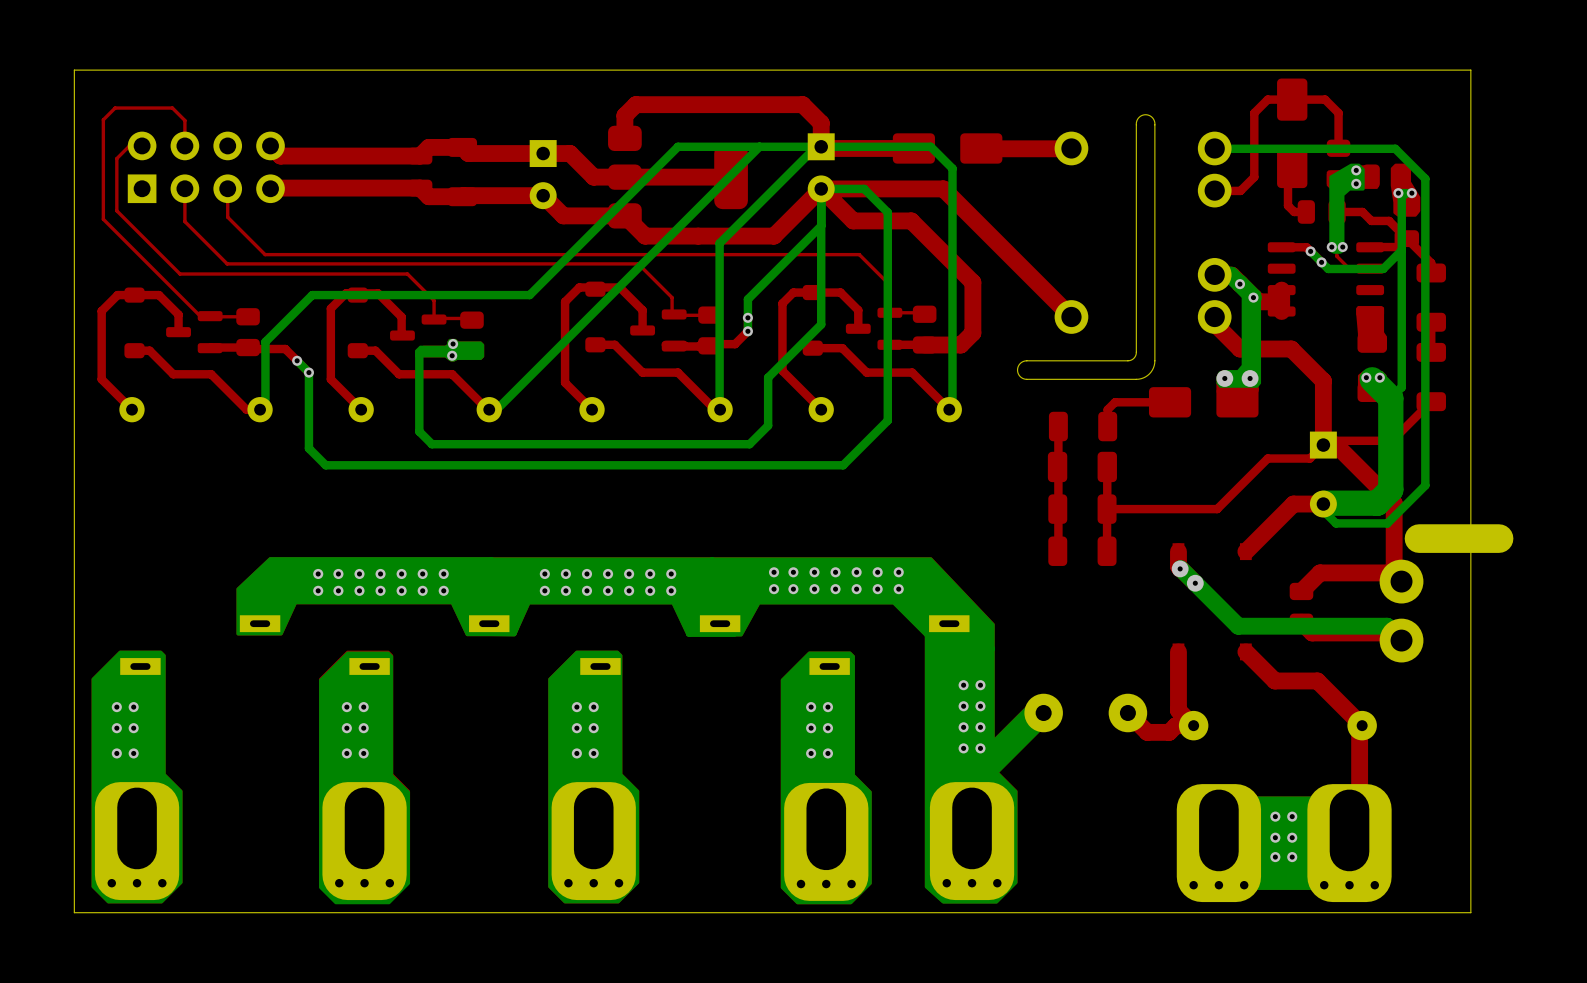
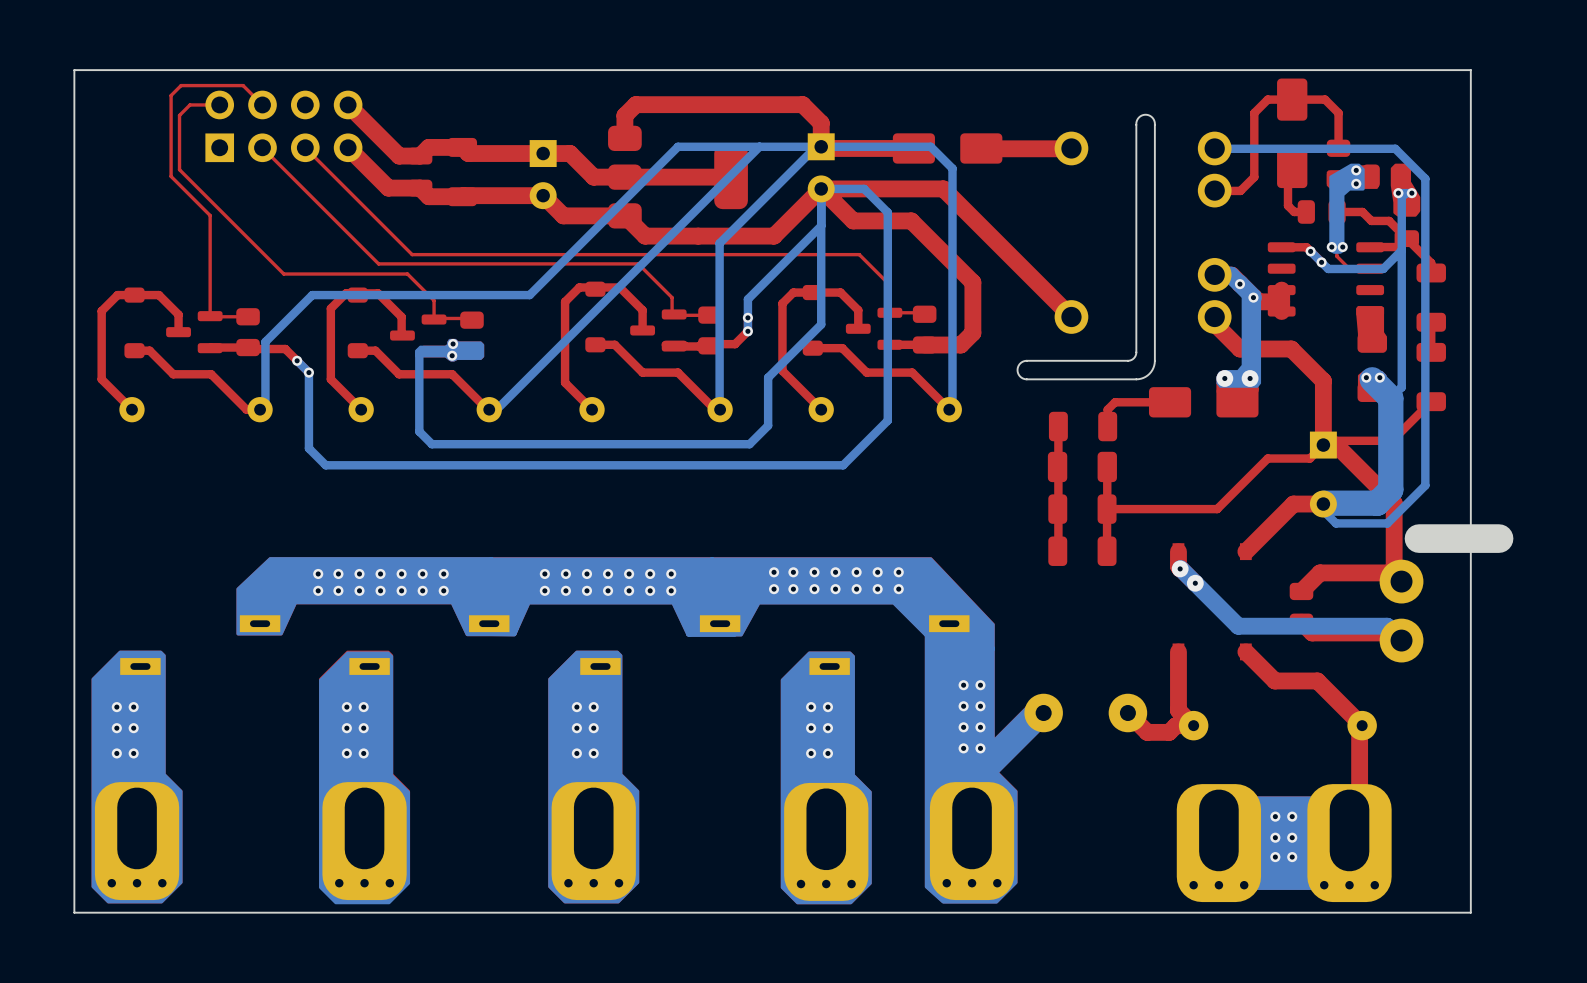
top track: (142, 145) (129, 145) (116, 158) (116, 210) (180, 274) (283, 274) -> (219, 104) (189, 104) (179, 115) (179, 169) (283, 274)
top track: (184, 145) (184, 120) (172, 108) (115, 108) (103, 119) (103, 219) (200, 316) (210, 316) -> (262, 104) (243, 85) (181, 85) (171, 95) (171, 176) (210, 215) (210, 316)
top track: (270, 145) (280, 156) (399, 156) -> (348, 104) (399, 156)
part position: (206, 167) -> (283, 126)
top track: (184, 188) (184, 221) (227, 263) (378, 263) -> (262, 147) (378, 263)
top track: (227, 188) (227, 217) (265, 254) (412, 254) -> (305, 147) (412, 254)
top track: (388, 188) (270, 188) -> (388, 188) (348, 147)

